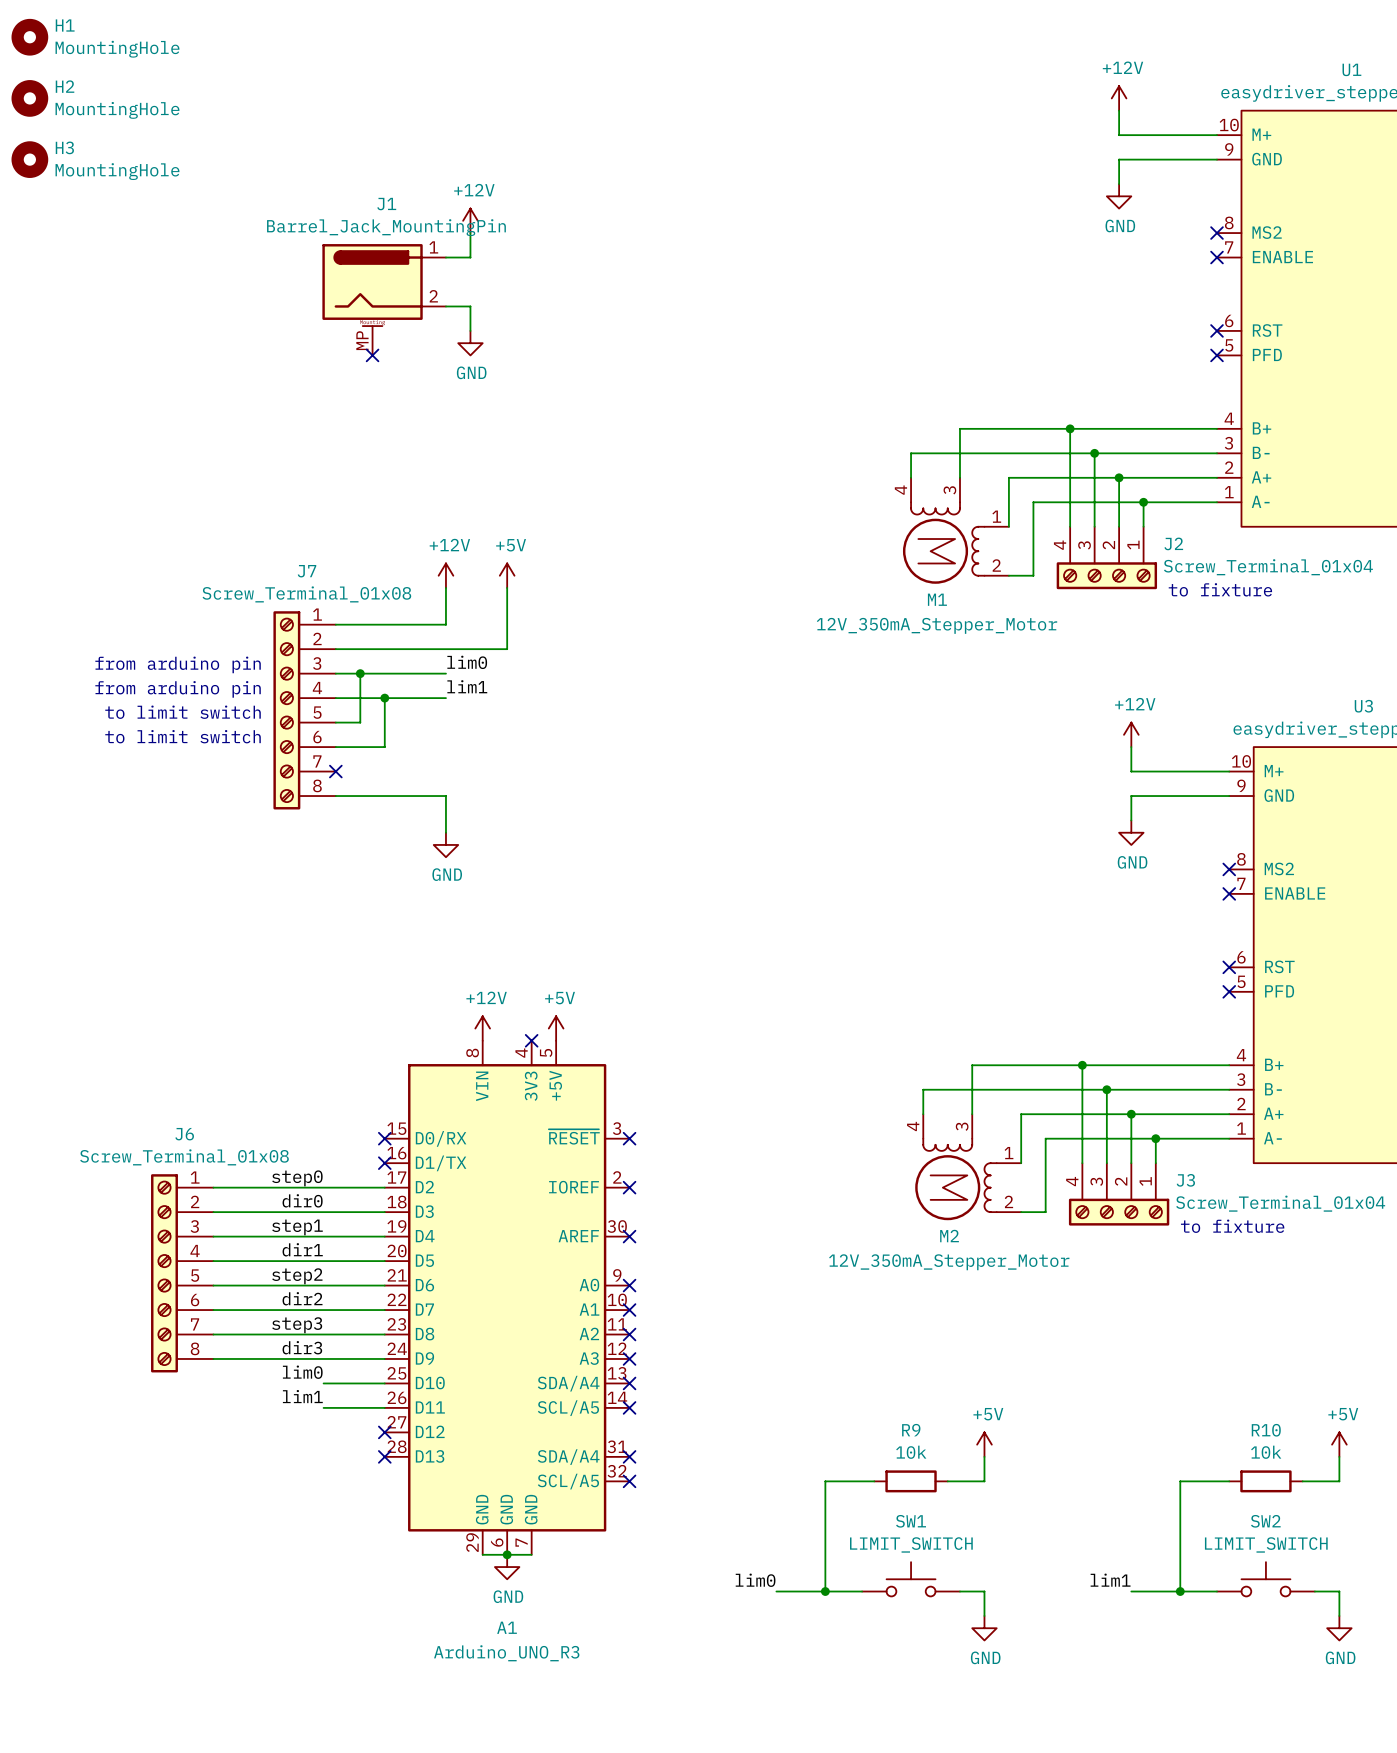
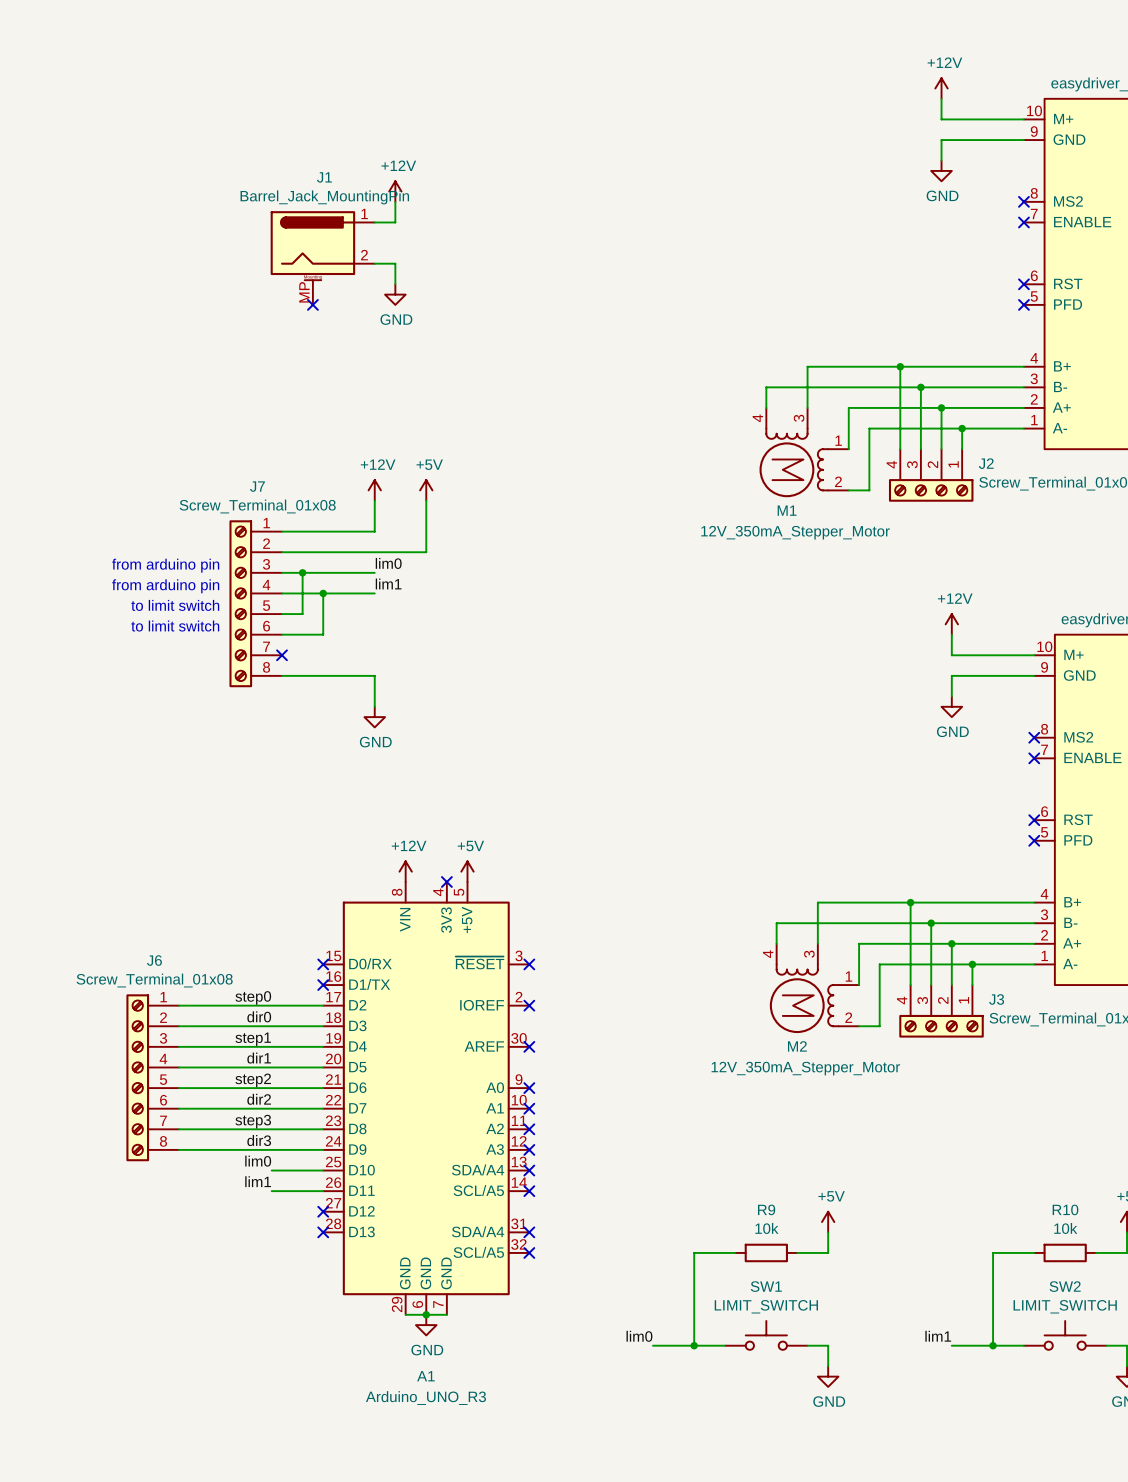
H1: MountingHole (29, 37) -> none
H2: MountingHole (29, 98) -> none
H3: MountingHole (29, 159) -> none
text: to fixture (1220, 589) -> none
text: to fixture (1232, 1226) -> none

